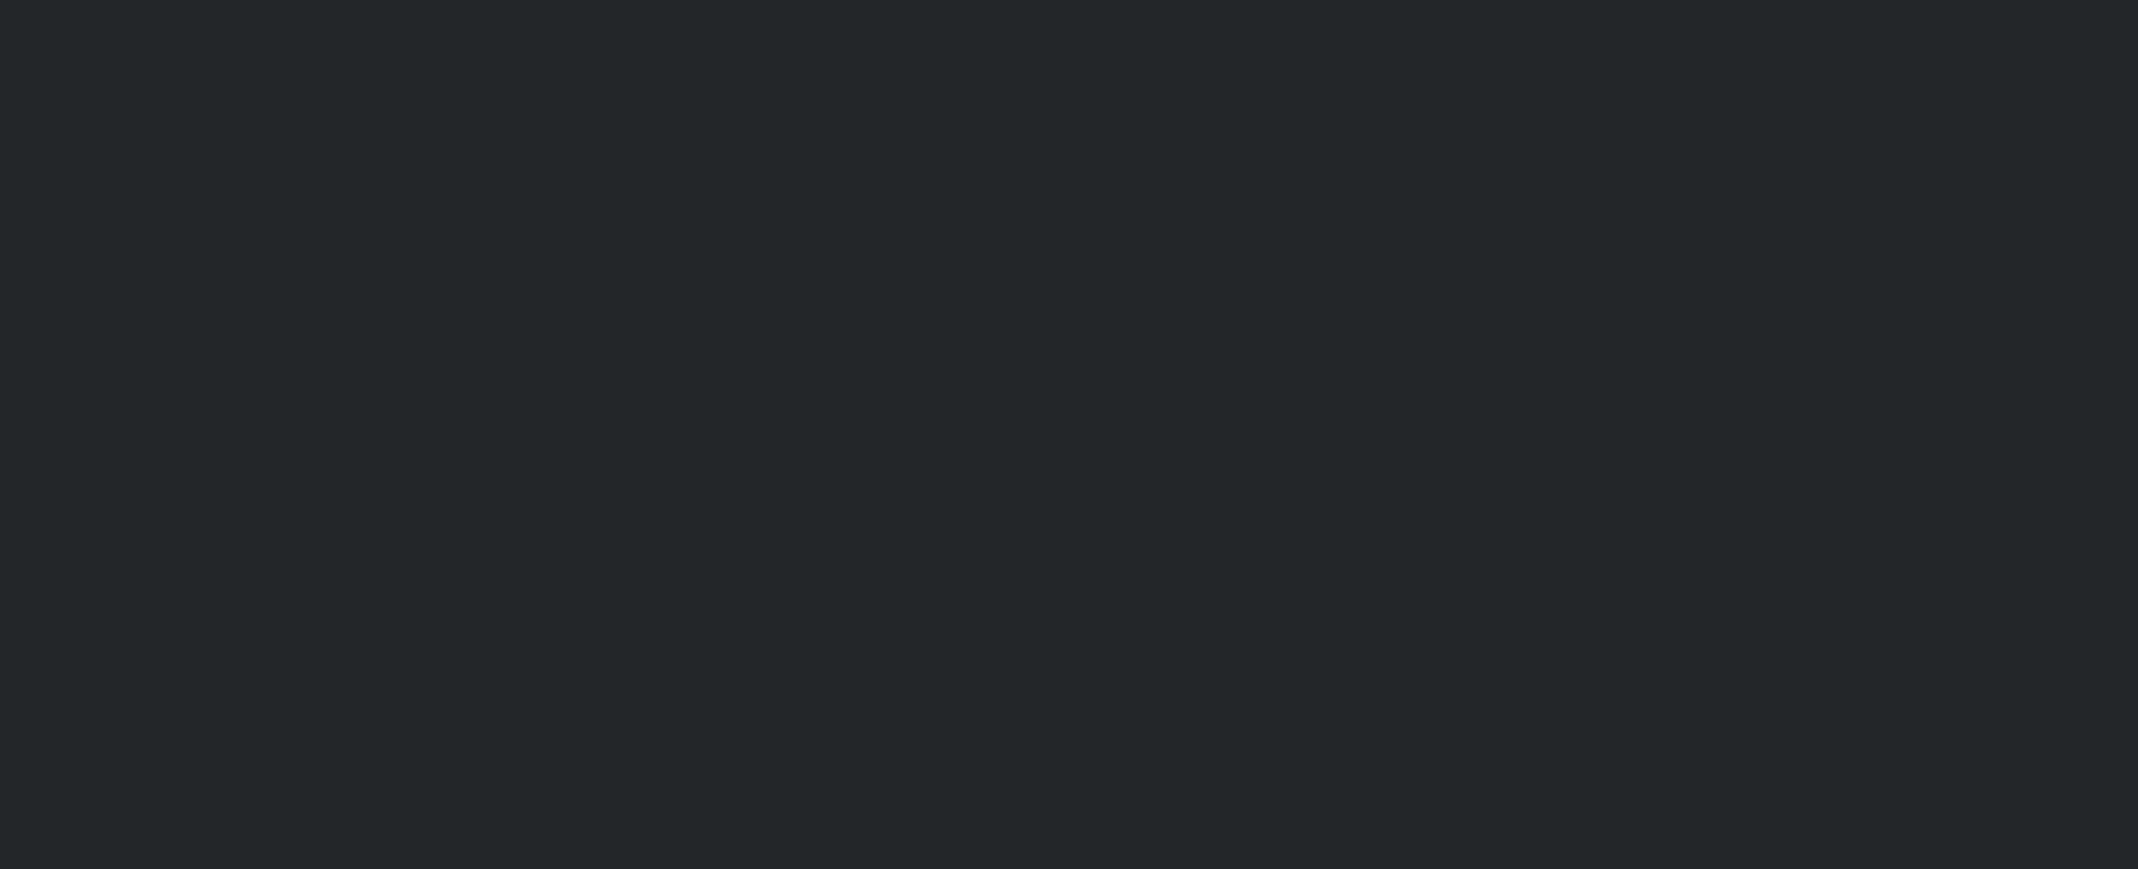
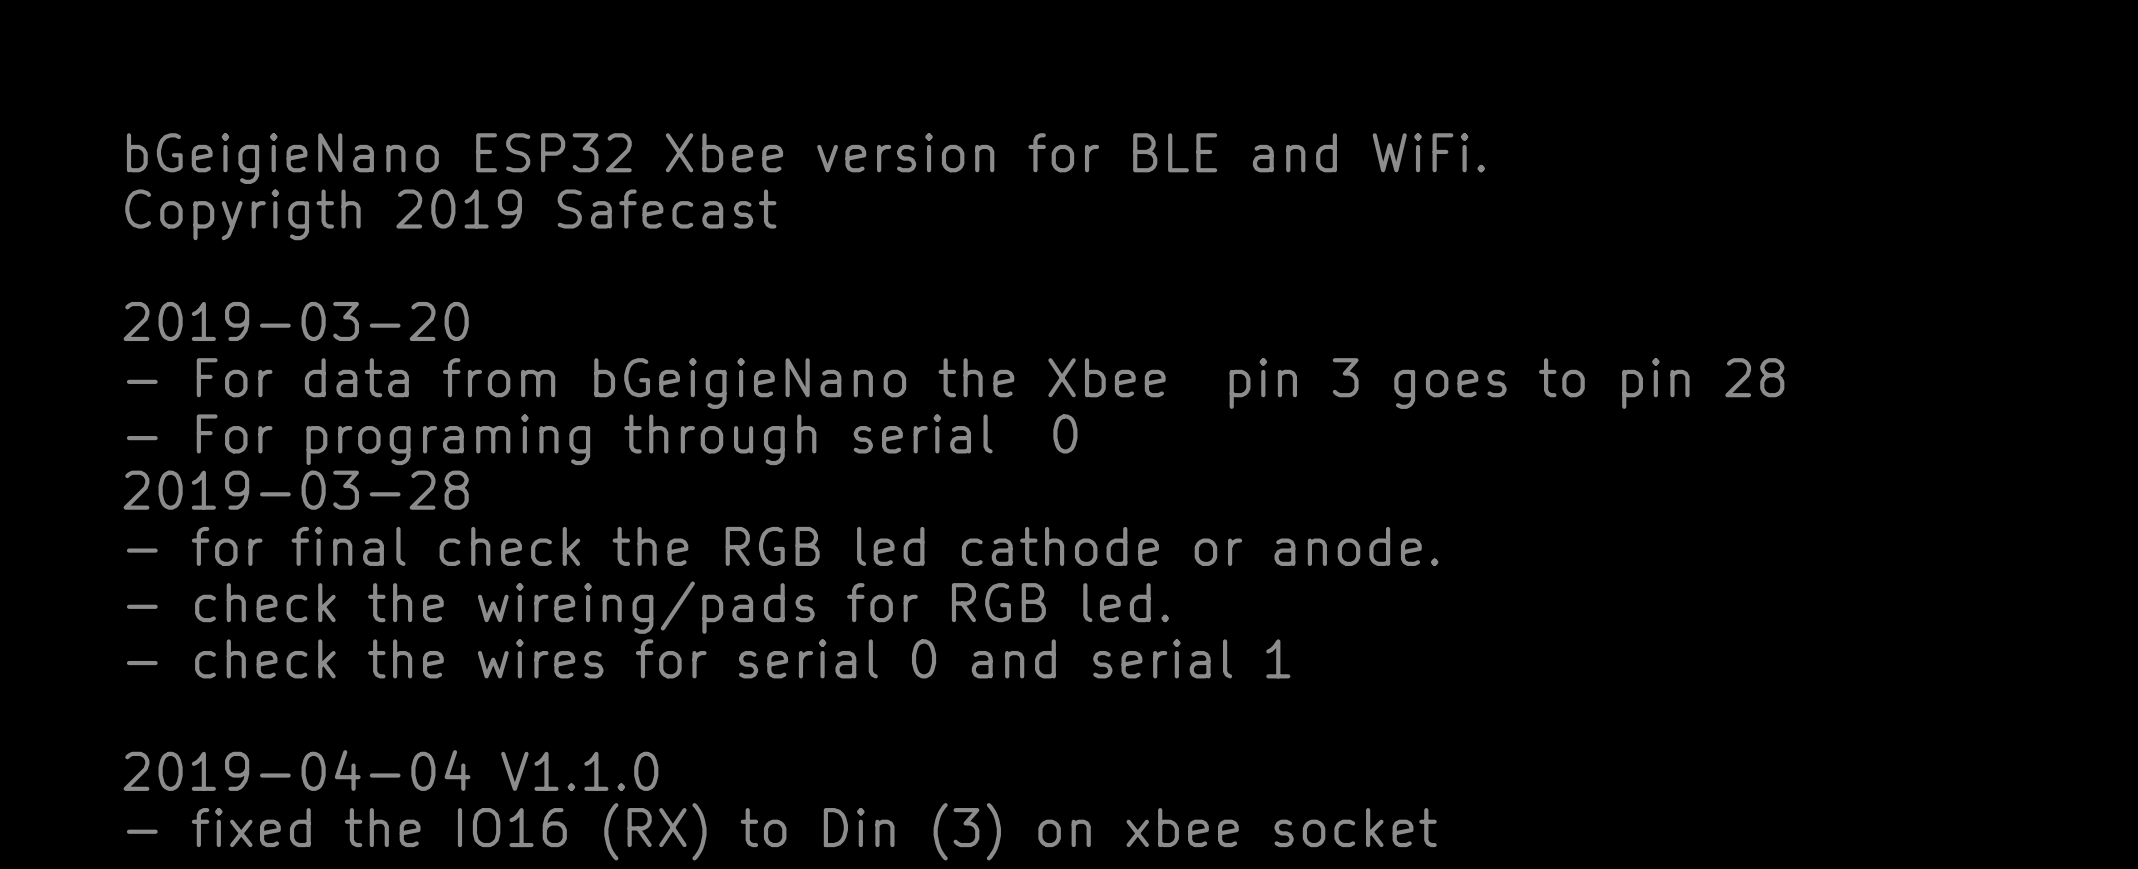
text: none -> bGeigieNano ESP32 Xbee version for BLE and WiFi. (805, 158)
text: none -> Copyrigth 2019 Safecast (450, 214)
text: none -> 2019-03-20 (296, 321)
text: none -> - For data from bGeigieNano the Xbee pin 3 goes to pin 28 (955, 383)
text: none -> - For programing through serial 0 (602, 439)
text: none -> 2019-03-28 (296, 490)
text: none -> - for final check the RGB led cathode or anode. (782, 546)
text: none -> - check the wireing/pads for RGB led. (647, 607)
text: none -> - check the wires for serial 0 and serial 1 (708, 658)
text: none -> 2019-04-04 V1.1.0 (390, 770)
text: none -> - fixed the IO16 (RX) to Din (3) on xbee socket (781, 831)

